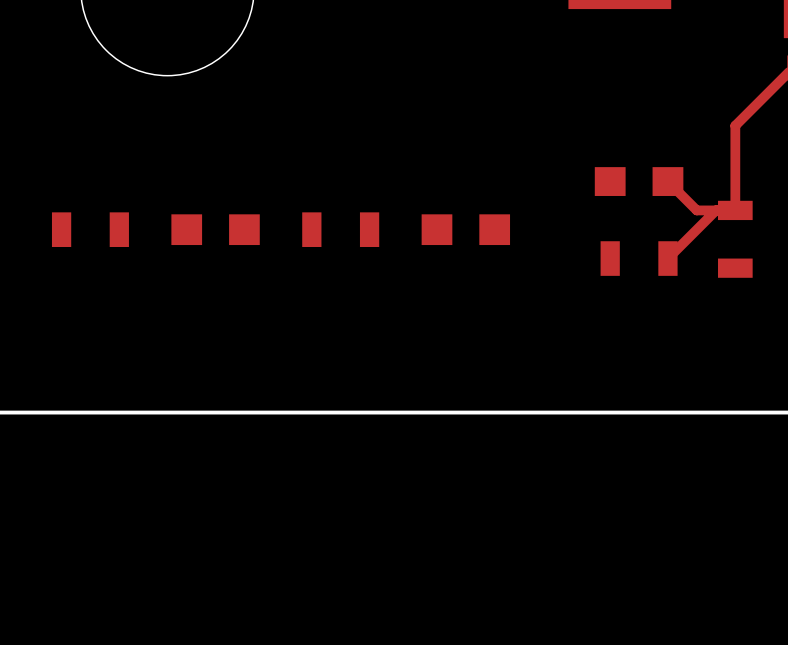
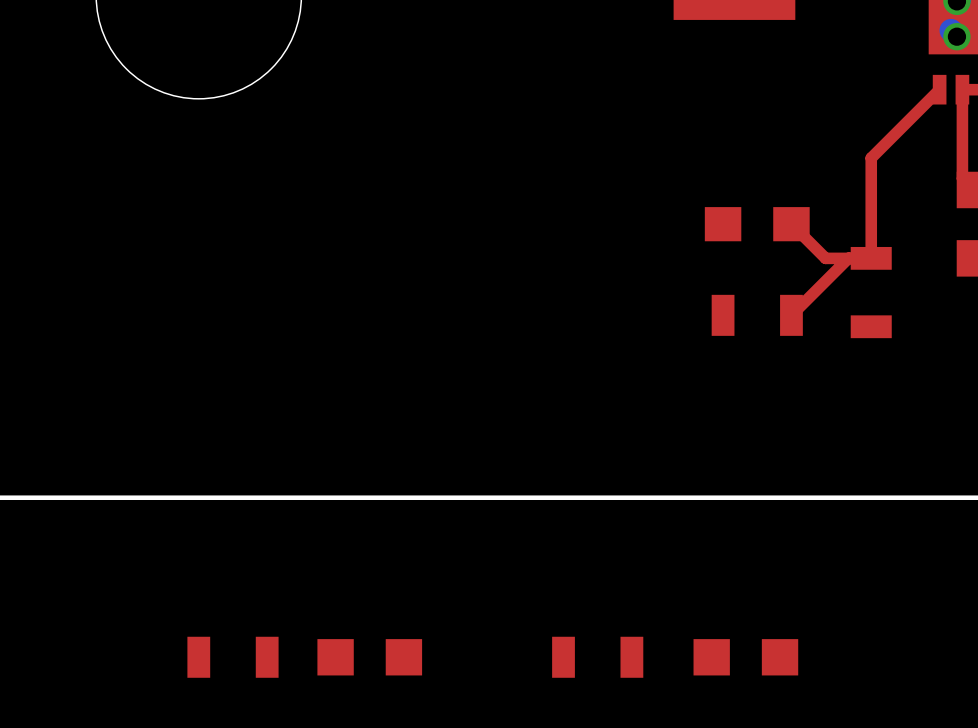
part: (90, 229) -> none
part: (215, 229) -> none
part: (340, 229) -> none
part: (465, 229) -> none
part: none -> (232, 657)
part: none -> (369, 657)
part: none -> (597, 657)
part: none -> (745, 657)

